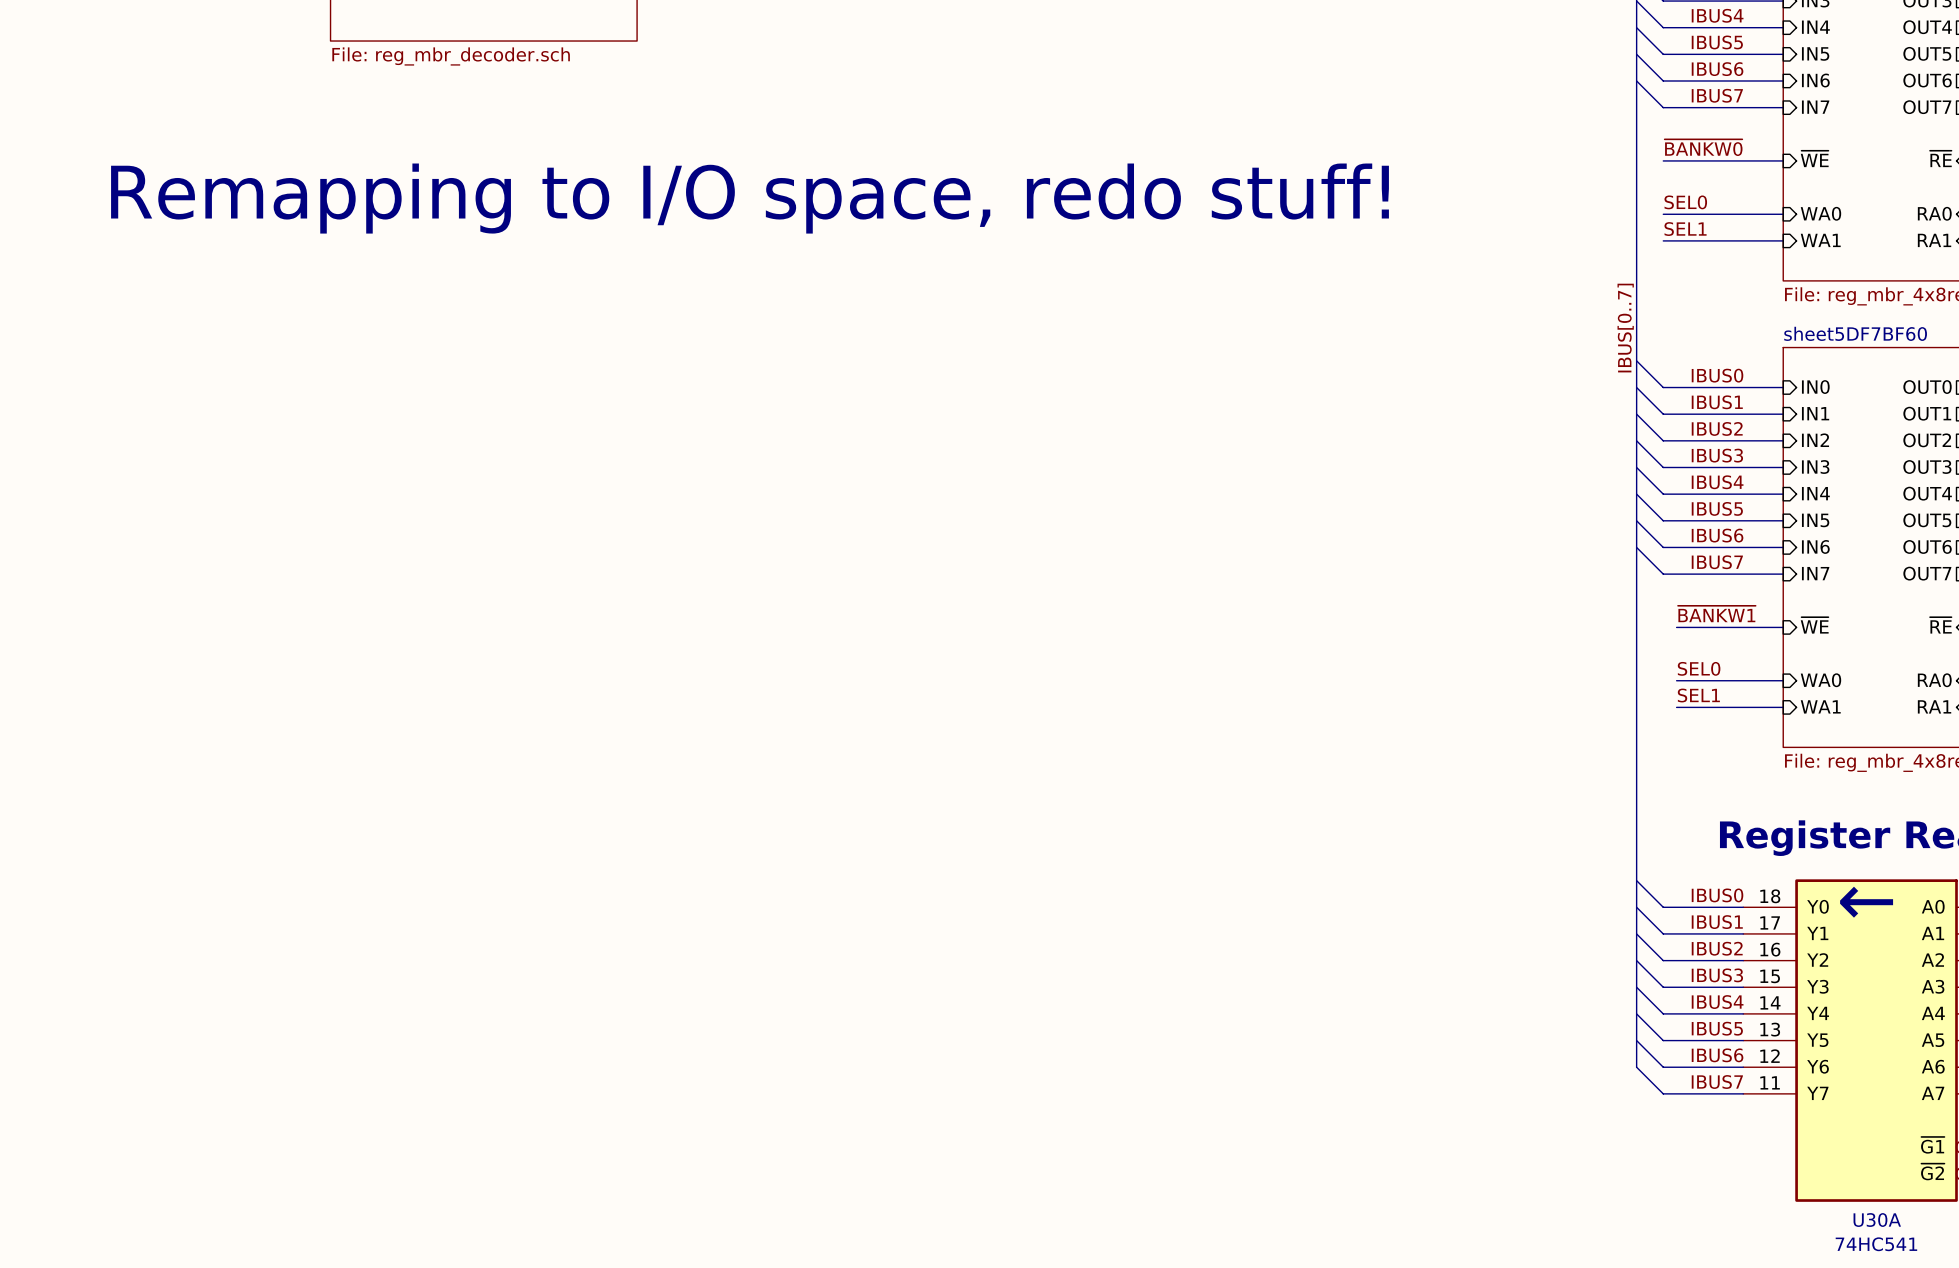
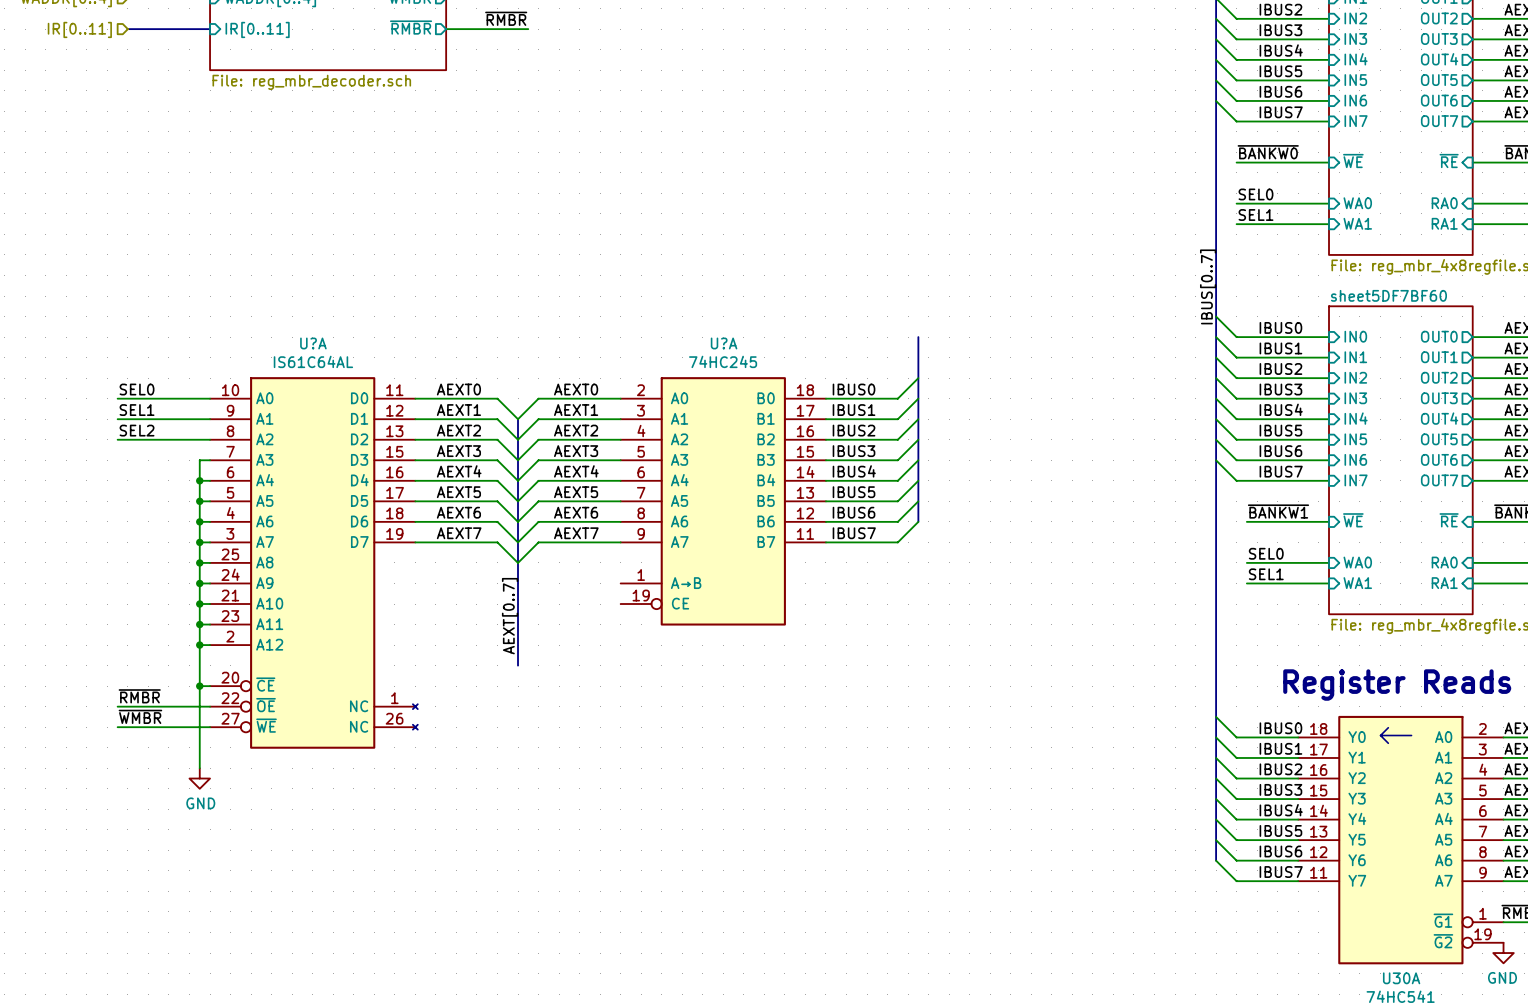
text: Remapping to I/O space, redo stuff! (750, 198) -> none
bus: none -> (918, 337) (918, 521)
wire: none -> (918, 378) (897, 398) (825, 398)
label: none -> SEL0 (137, 389)
label: none -> AEXT0 (458, 389)
label: none -> AEXT0 (576, 389)
label: none -> IBUS0 (854, 389)
wire: none -> (117, 398) (210, 398)
wire: none -> (415, 398) (497, 398) (518, 419) (538, 398) (620, 398)
wire: none -> (918, 398) (897, 419) (825, 419)
label: none -> SEL1 (137, 410)
label: none -> AEXT1 (458, 410)
label: none -> AEXT1 (576, 410)
label: none -> IBUS1 (854, 410)
wire: none -> (117, 419) (210, 419)
wire: none -> (415, 419) (497, 419) (518, 439) (538, 419) (620, 419)
bus: none -> (518, 419) (518, 665)
wire: none -> (918, 419) (897, 439) (825, 439)
label: none -> SEL2 (137, 430)
label: none -> AEXT2 (458, 430)
label: none -> AEXT2 (576, 430)
label: none -> IBUS2 (854, 430)
wire: none -> (117, 439) (210, 439)
wire: none -> (415, 439) (497, 439) (518, 460) (538, 439) (620, 439)
wire: none -> (918, 439) (897, 460) (825, 460)
label: none -> AEXT3 (458, 451)
label: none -> AEXT3 (576, 451)
label: none -> IBUS3 (854, 451)
wire: none -> (210, 460) (199, 460) (199, 768)
wire: none -> (415, 460) (497, 460) (518, 480) (538, 460) (620, 460)
wire: none -> (918, 460) (897, 480) (825, 480)
label: none -> AEXT4 (459, 471)
label: none -> AEXT4 (576, 471)
label: none -> IBUS4 (854, 471)
wire: none -> (199, 480) (210, 480)
junction: none -> (199, 480)
wire: none -> (415, 480) (497, 480) (518, 501) (538, 480) (620, 480)
wire: none -> (918, 480) (897, 501) (825, 501)
label: none -> IBUS5 (854, 492)
label: none -> AEXT5 (458, 492)
label: none -> AEXT5 (576, 492)
wire: none -> (199, 501) (210, 501)
junction: none -> (199, 501)
wire: none -> (415, 501) (497, 501) (518, 521) (538, 501) (620, 501)
U?A: none -> 74HC245 (723, 501)
wire: none -> (918, 501) (897, 521) (825, 521)
label: none -> AEXT6 (458, 512)
label: none -> AEXT6 (576, 512)
label: none -> IBUS6 (854, 512)
wire: none -> (199, 521) (210, 521)
junction: none -> (199, 521)
wire: none -> (415, 521) (497, 521) (518, 542) (538, 521) (620, 521)
wire: none -> (918, 521) (897, 542) (825, 542)
label: none -> AEXT7 (459, 533)
label: none -> AEXT7 (576, 533)
label: none -> IBUS7 (854, 533)
wire: none -> (199, 542) (210, 542)
junction: none -> (199, 542)
wire: none -> (415, 542) (497, 542) (518, 562) (538, 542) (620, 542)
wire: none -> (199, 562) (210, 562)
junction: none -> (199, 562)
U?A: none -> IS61C64AL (313, 562)
wire: none -> (199, 583) (210, 583)
junction: none -> (199, 583)
wire: none -> (199, 604) (210, 604)
junction: none -> (199, 604)
label: none -> AEXT[0..7] (510, 616)
wire: none -> (199, 624) (210, 624)
junction: none -> (199, 624)
wire: none -> (199, 645) (210, 645)
junction: none -> (199, 645)
wire: none -> (199, 686) (210, 686)
junction: none -> (199, 686)
label: none -> ~{RMBR} (139, 696)
wire: none -> (117, 706) (210, 706)
label: none -> ~{WMBR} (140, 716)
wire: none -> (117, 727) (210, 727)
power symbol: none -> GND (199, 778)

